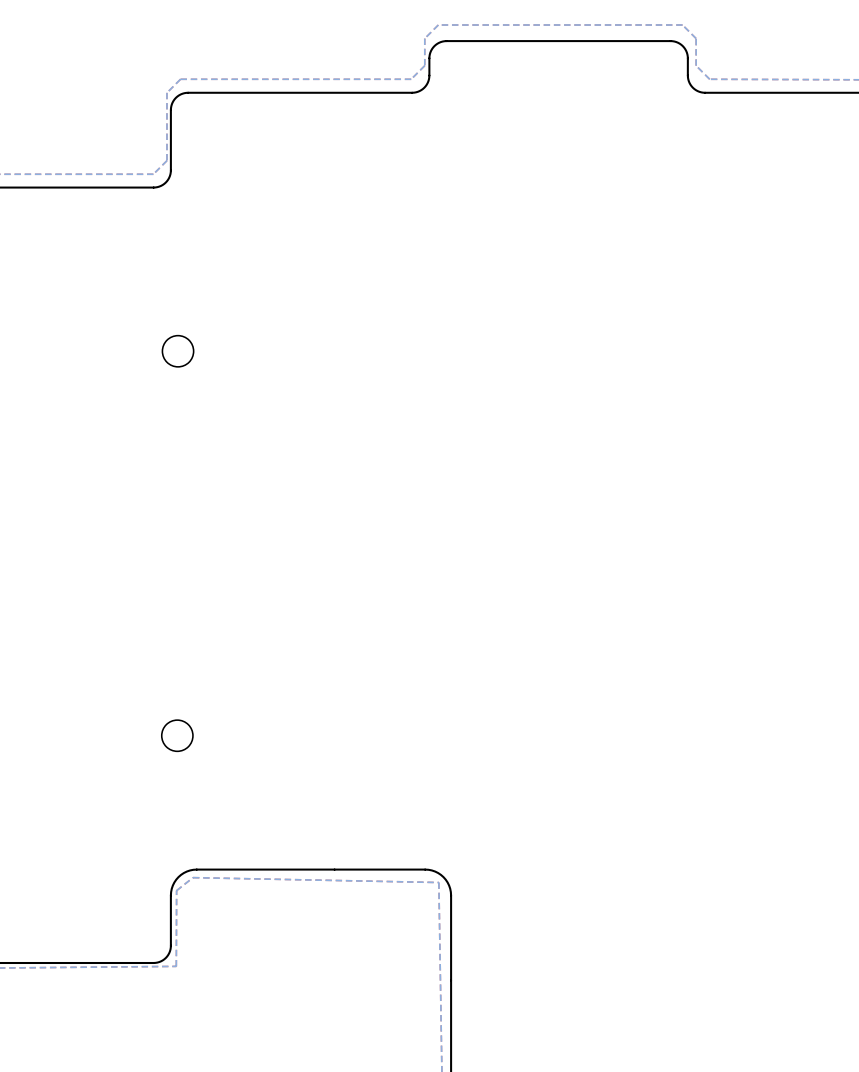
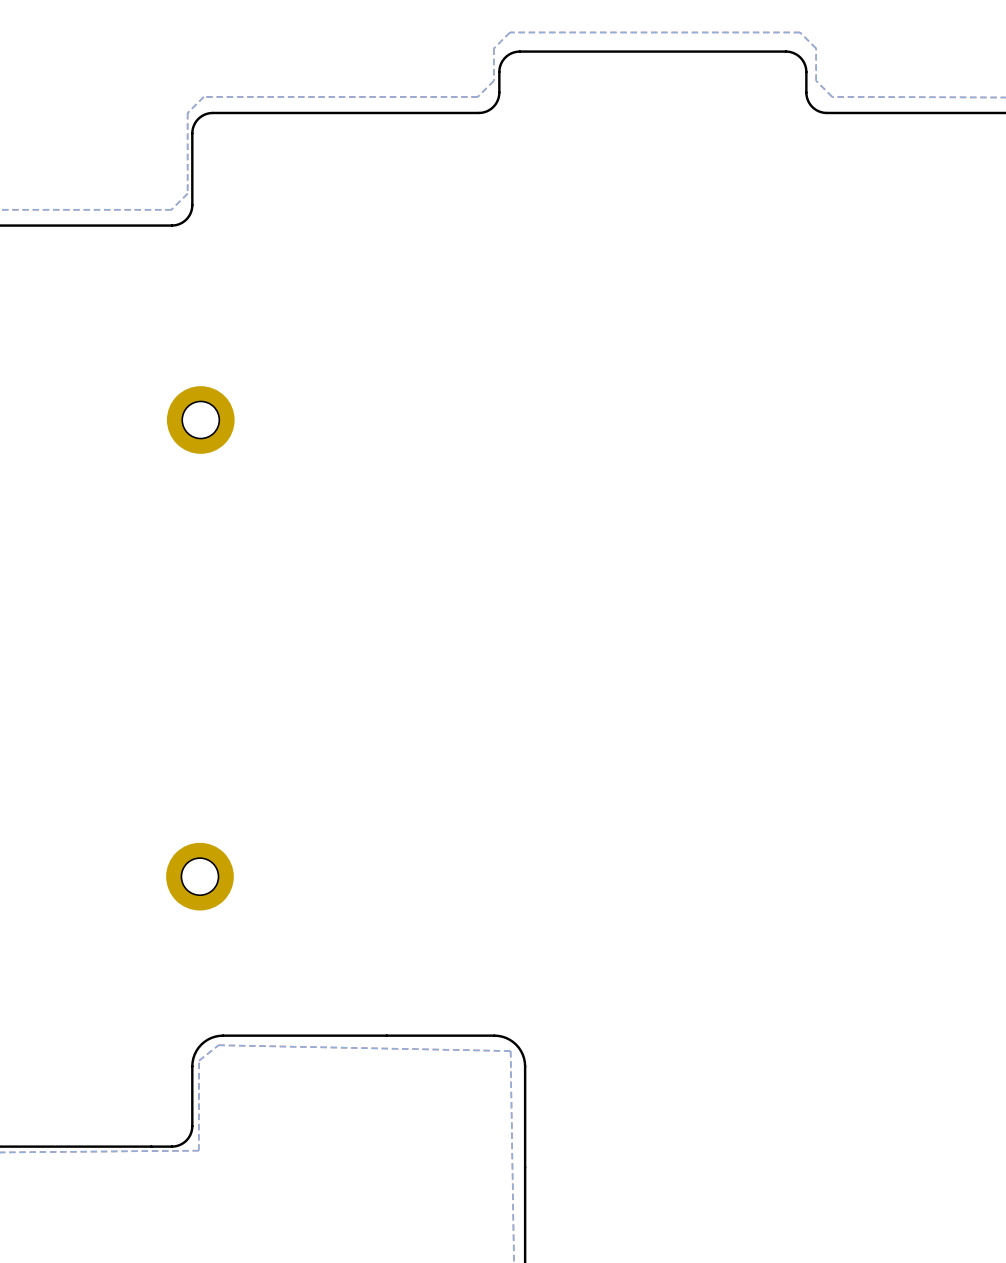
drawing: [161, 334, 195, 368] -> none
part: none -> (200, 420)
drawing: [161, 719, 194, 753] -> none
part: none -> (199, 876)

